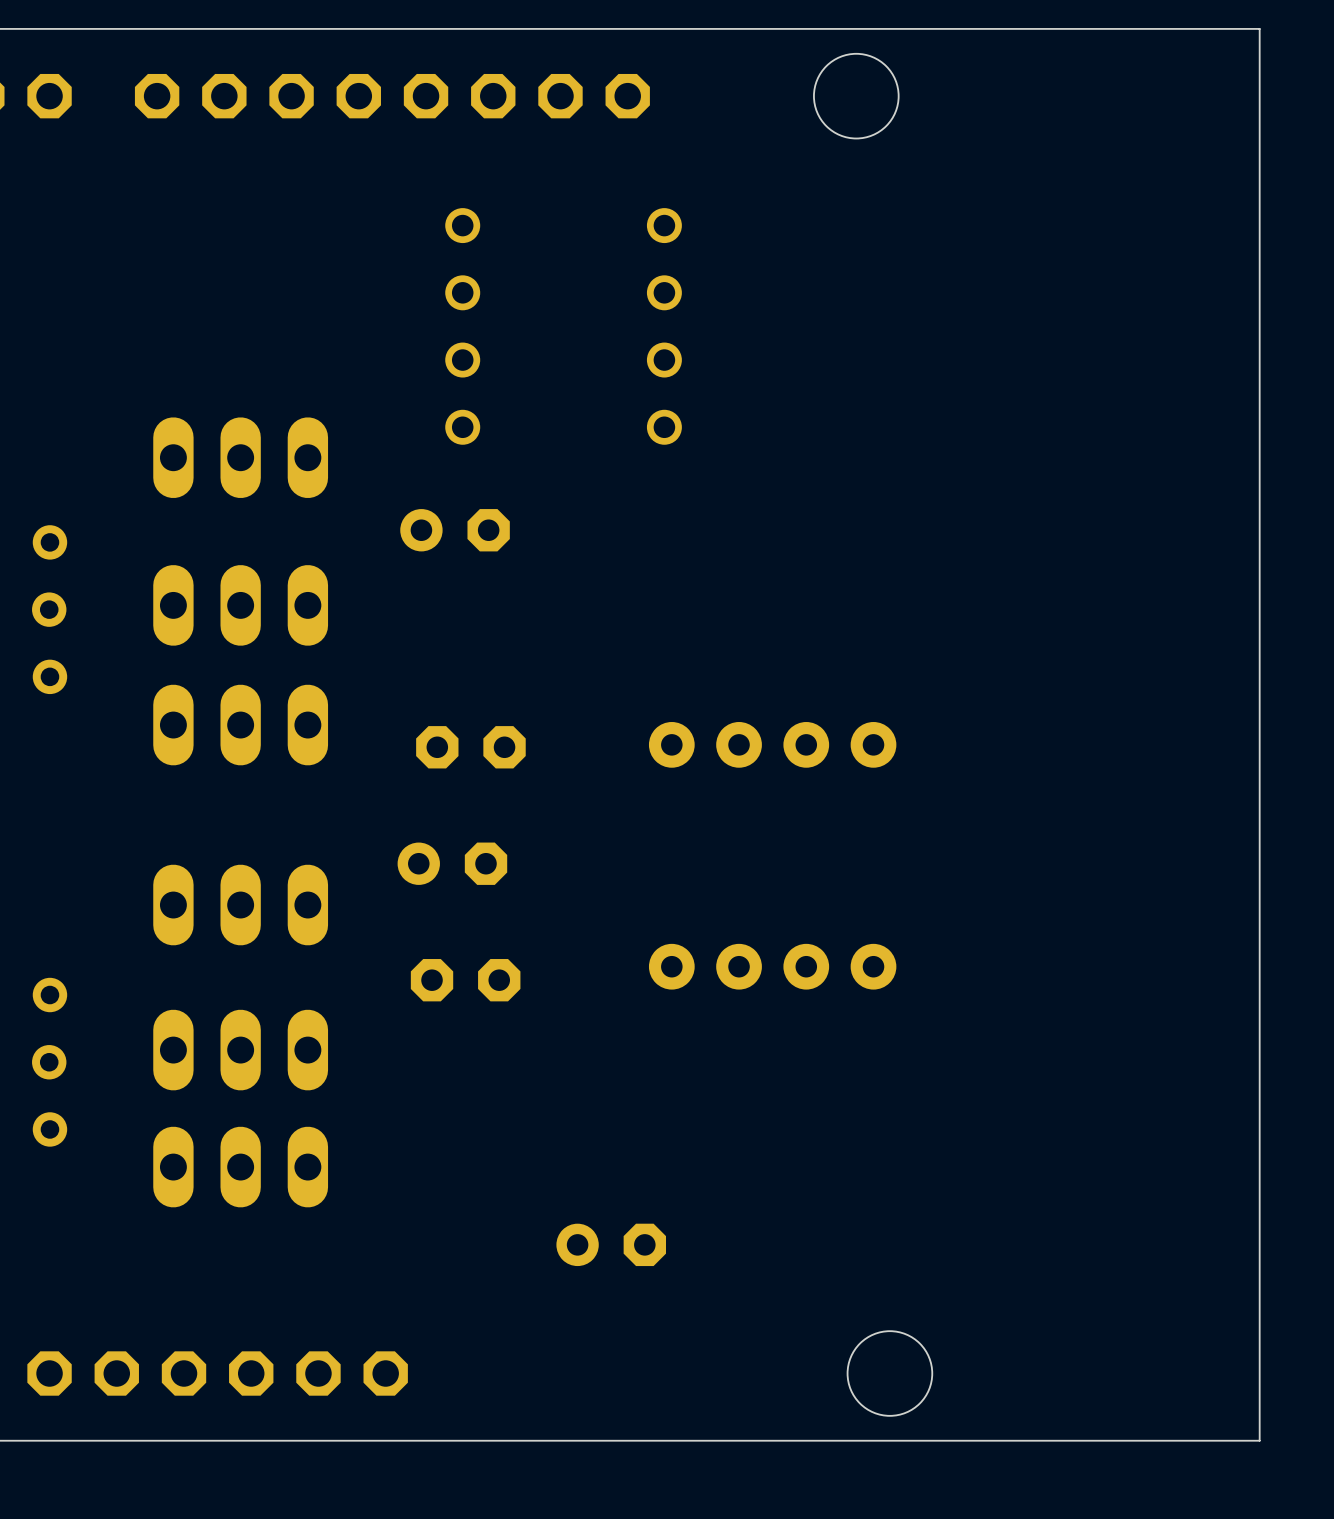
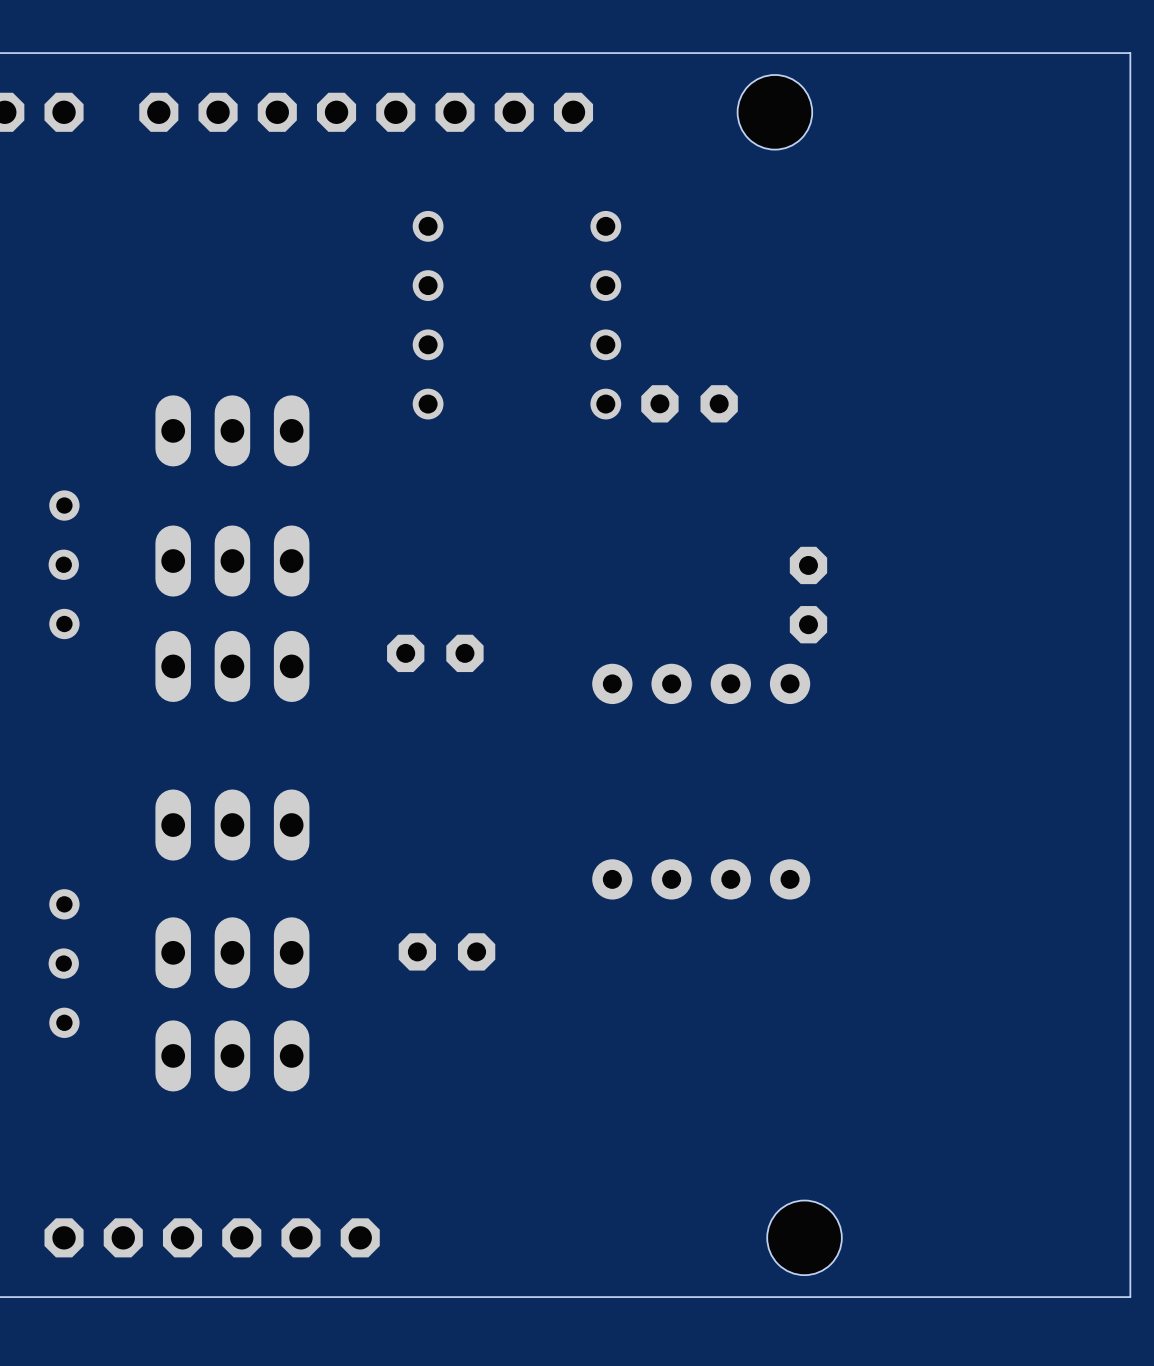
part: none -> (689, 403)
part: (455, 530) -> none
part: none -> (808, 595)
part position: (470, 747) -> (435, 653)
part: (452, 863) -> none
part position: (465, 980) -> (446, 951)
part: (611, 1244) -> none

